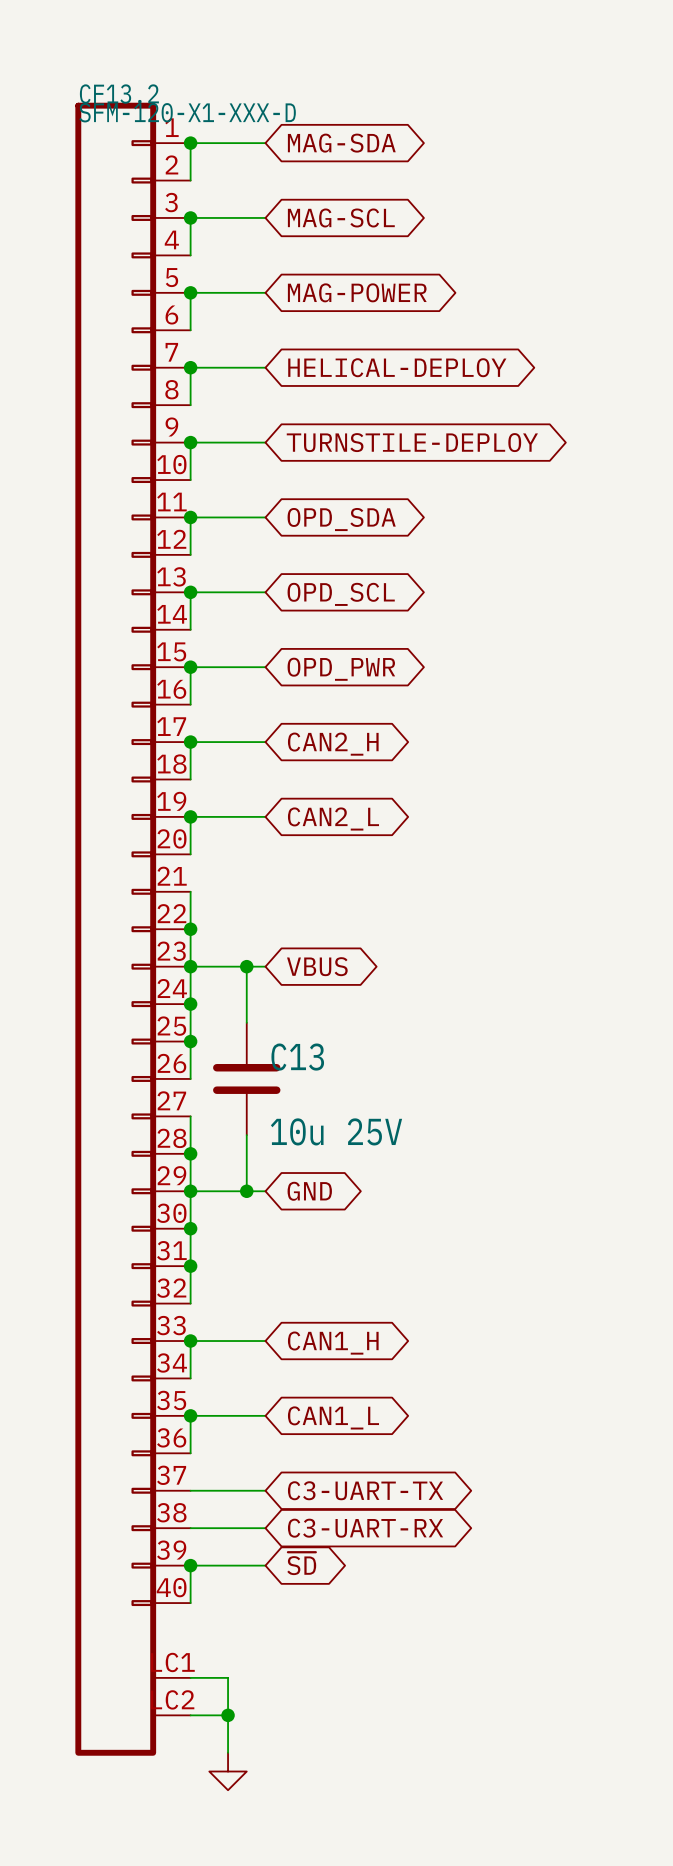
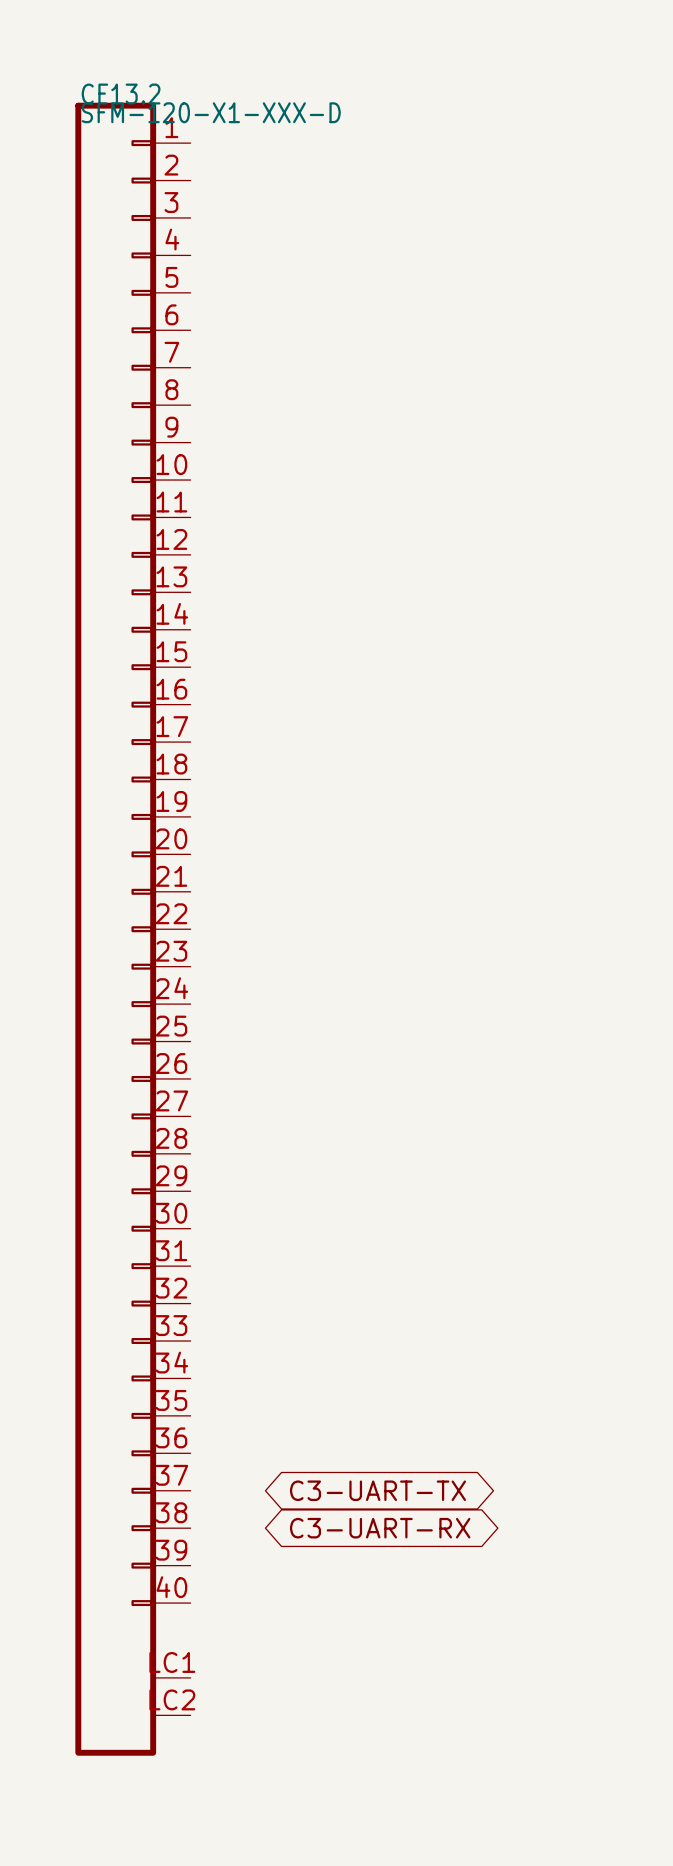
junction: (190, 143) -> none
wire: (265, 143) (190, 143) (190, 180) -> none
global label: MAG-SDA (341, 143) -> none
junction: (190, 217) -> none
wire: (265, 217) (190, 217) (190, 255) -> none
global label: MAG-SCL (341, 217) -> none
junction: (190, 292) -> none
wire: (265, 292) (190, 292) (190, 330) -> none
global label: MAG-POWER (357, 292) -> none
junction: (190, 367) -> none
wire: (265, 367) (190, 367) (190, 405) -> none
global label: HELICAL-DEPLOY (397, 367) -> none
junction: (190, 442) -> none
wire: (265, 442) (190, 442) (190, 480) -> none
global label: TURNSTILE-DEPLOY (412, 442) -> none
junction: (190, 517) -> none
wire: (265, 517) (190, 517) (190, 554) -> none
global label: OPD_SDA (341, 519) -> none
junction: (190, 592) -> none
wire: (265, 592) (190, 592) (190, 629) -> none
global label: OPD_SCL (341, 594) -> none
junction: (190, 667) -> none
wire: (265, 667) (190, 667) (190, 704) -> none
global label: OPD_PWR (341, 669) -> none
junction: (190, 742) -> none
wire: (265, 742) (190, 742) (190, 779) -> none
global label: CAN2_H (333, 744) -> none
junction: (190, 816) -> none
wire: (265, 816) (190, 816) (190, 854) -> none
global label: CAN2_L (333, 818) -> none
wire: (190, 891) (190, 1078) -> none
junction: (190, 929) -> none
wire: (190, 966) (265, 966) -> none
junction: (190, 966) -> none
wire: (246, 966) (246, 1022) -> none
junction: (246, 966) -> none
global label: VBUS (317, 966) -> none
junction: (190, 1004) -> none
junction: (190, 1041) -> none
C13: 10u 25V (246, 1078) -> none
wire: (190, 1116) (190, 1303) -> none
wire: (246, 1135) (246, 1191) -> none
junction: (190, 1153) -> none
wire: (190, 1191) (265, 1191) -> none
junction: (190, 1191) -> none
junction: (246, 1191) -> none
global label: GND (309, 1191) -> none
junction: (190, 1228) -> none
junction: (190, 1266) -> none
junction: (190, 1341) -> none
wire: (265, 1341) (190, 1341) (190, 1378) -> none
global label: CAN1_H (333, 1343) -> none
junction: (190, 1415) -> none
wire: (265, 1415) (190, 1415) (190, 1453) -> none
global label: CAN1_L (333, 1417) -> none
wire: (190, 1490) (265, 1490) -> none
wire: (190, 1528) (265, 1528) -> none
global label: ~{SD} (301, 1563) -> none
junction: (190, 1565) -> none
wire: (265, 1565) (190, 1565) (190, 1603) -> none
wire: (190, 1677) (228, 1677) (228, 1752) -> none
wire: (190, 1715) (228, 1715) -> none
junction: (228, 1715) -> none
power symbol: (228, 1771) -> none

